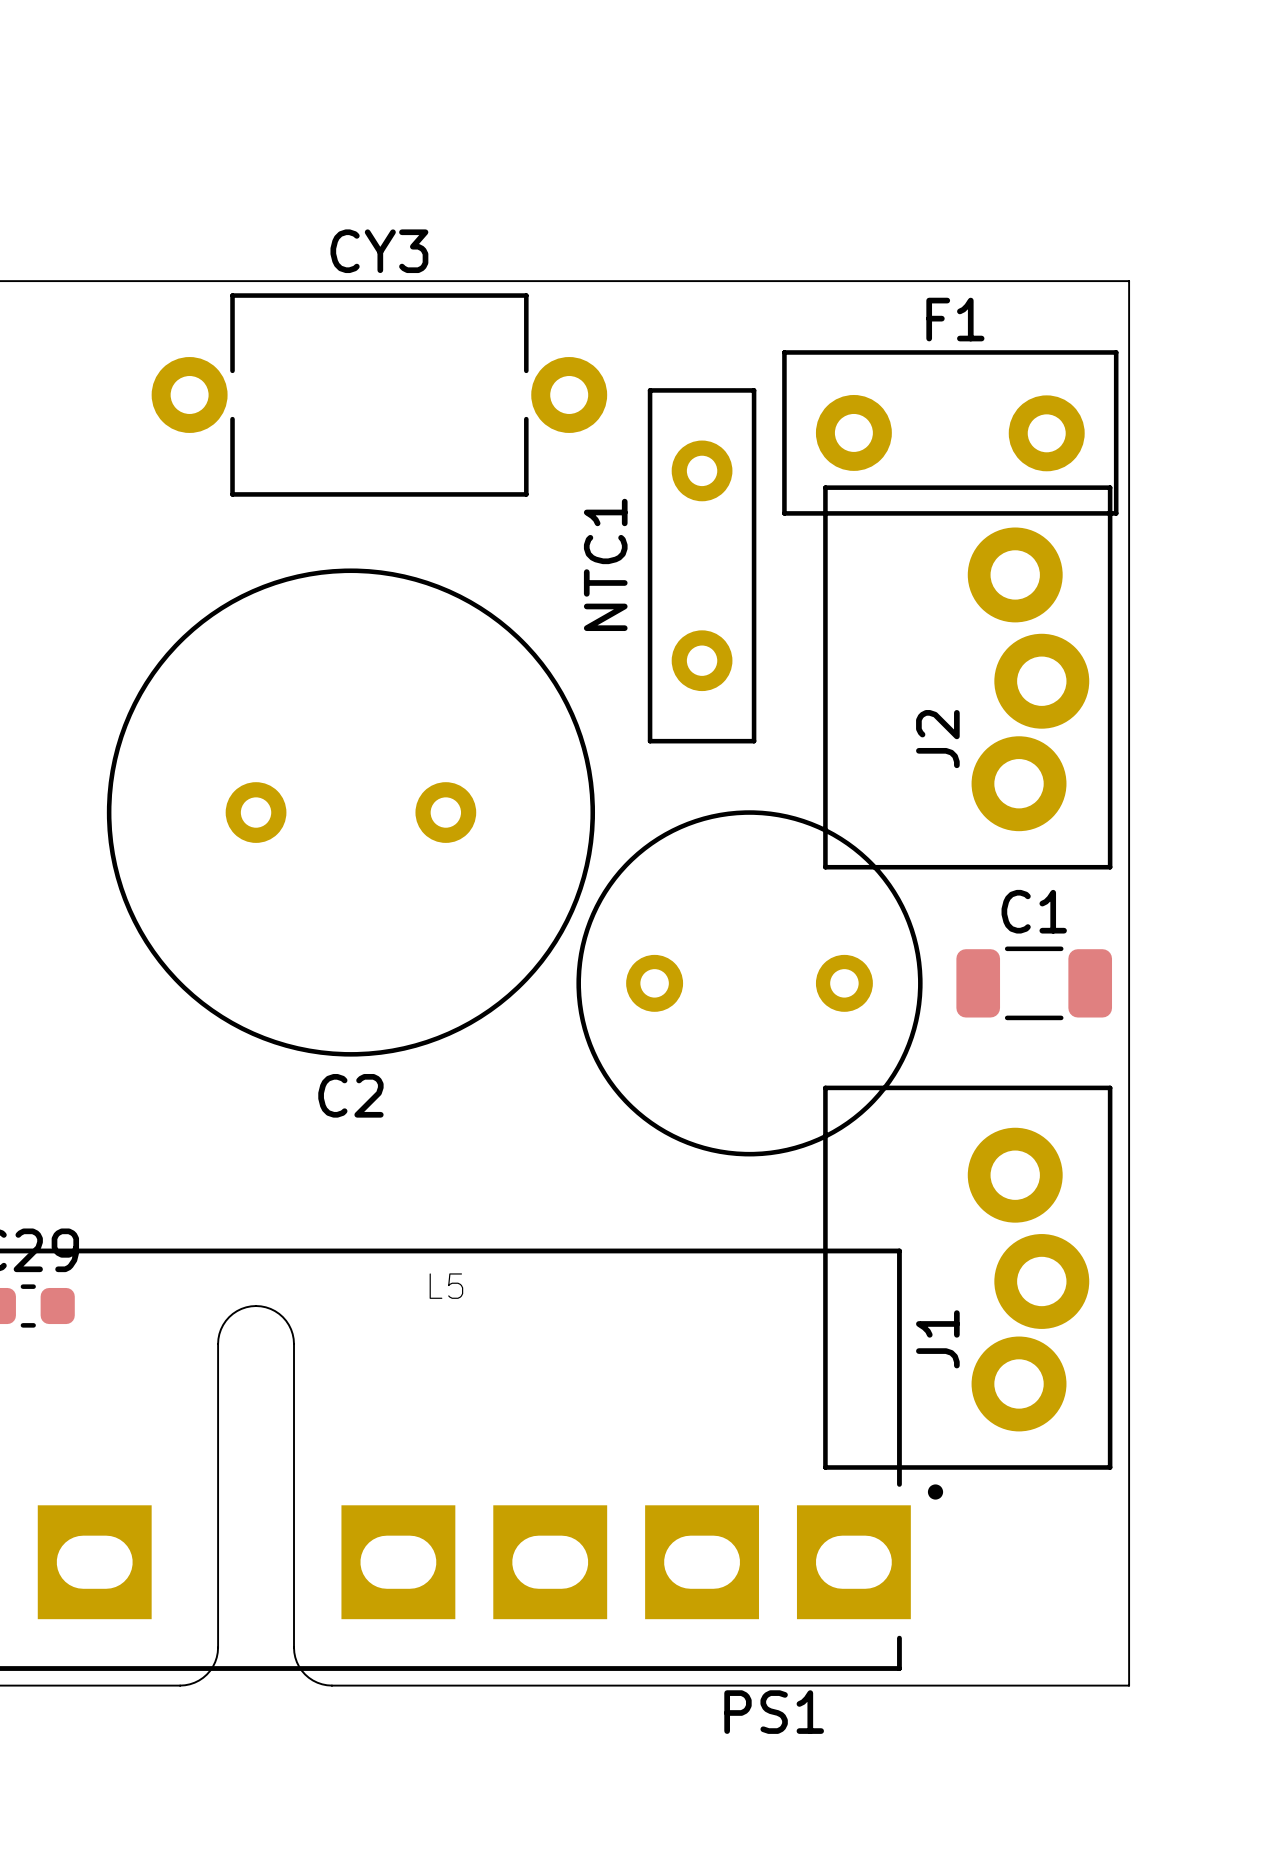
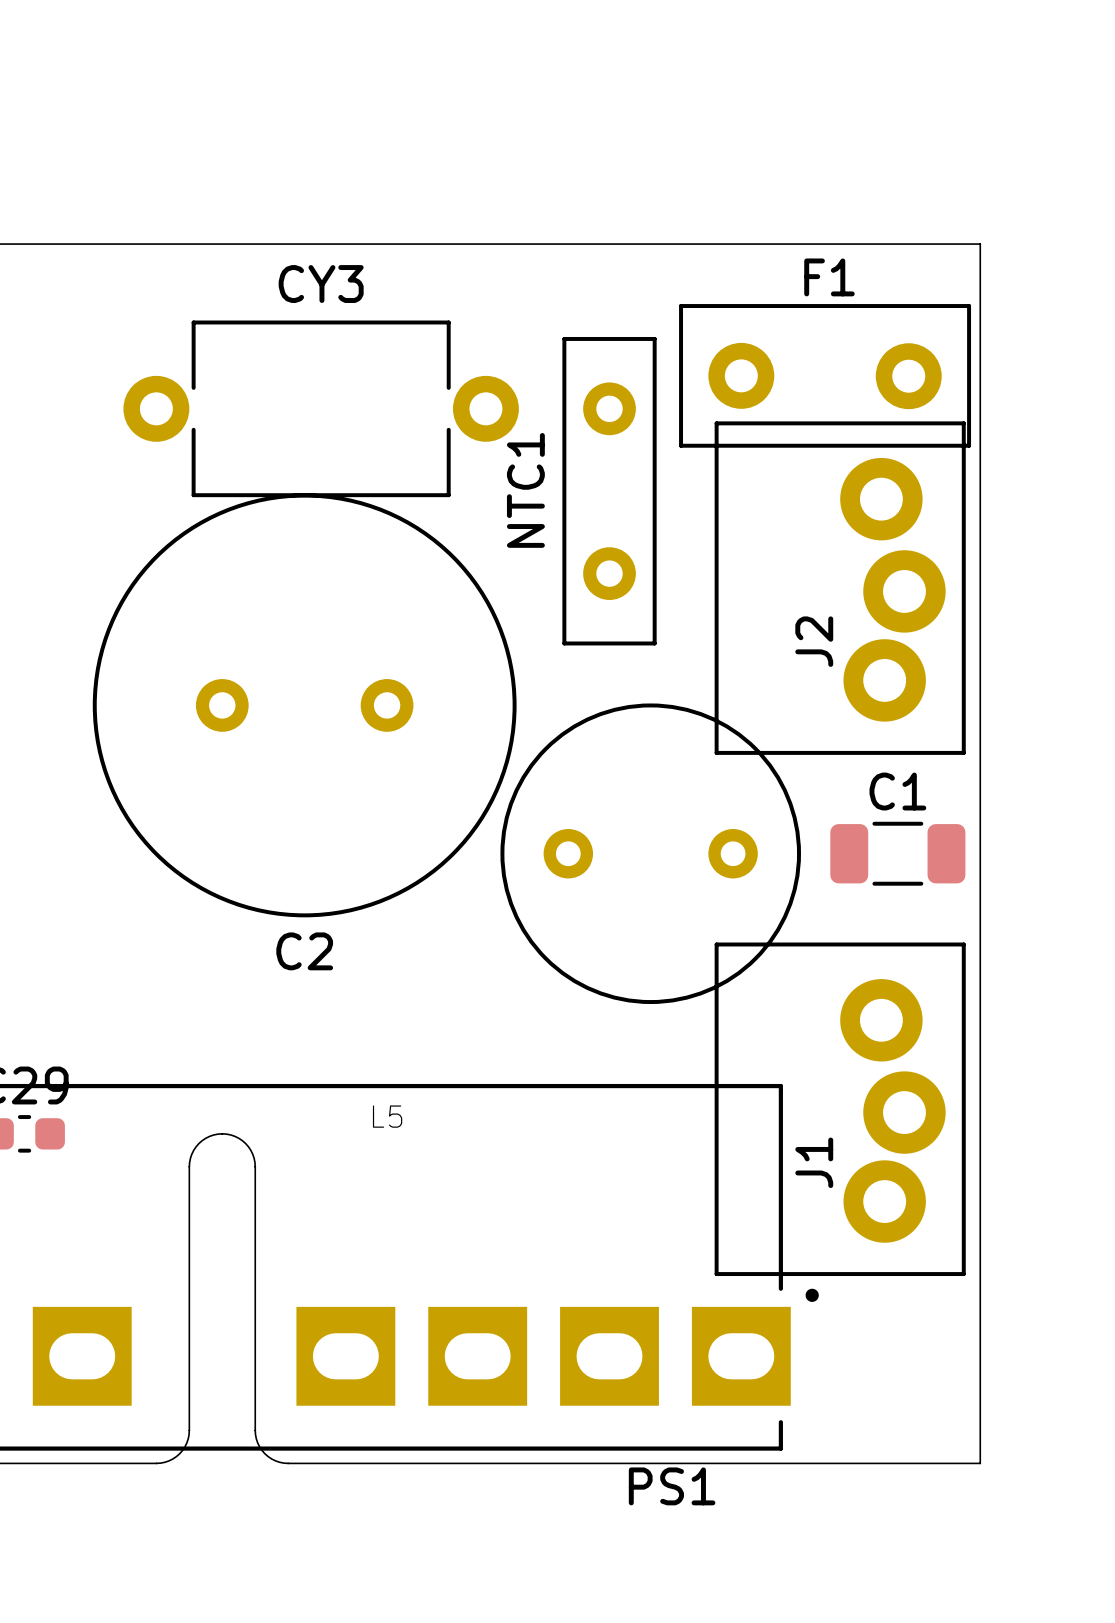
CY3 position: (379, 394) -> (321, 408)

